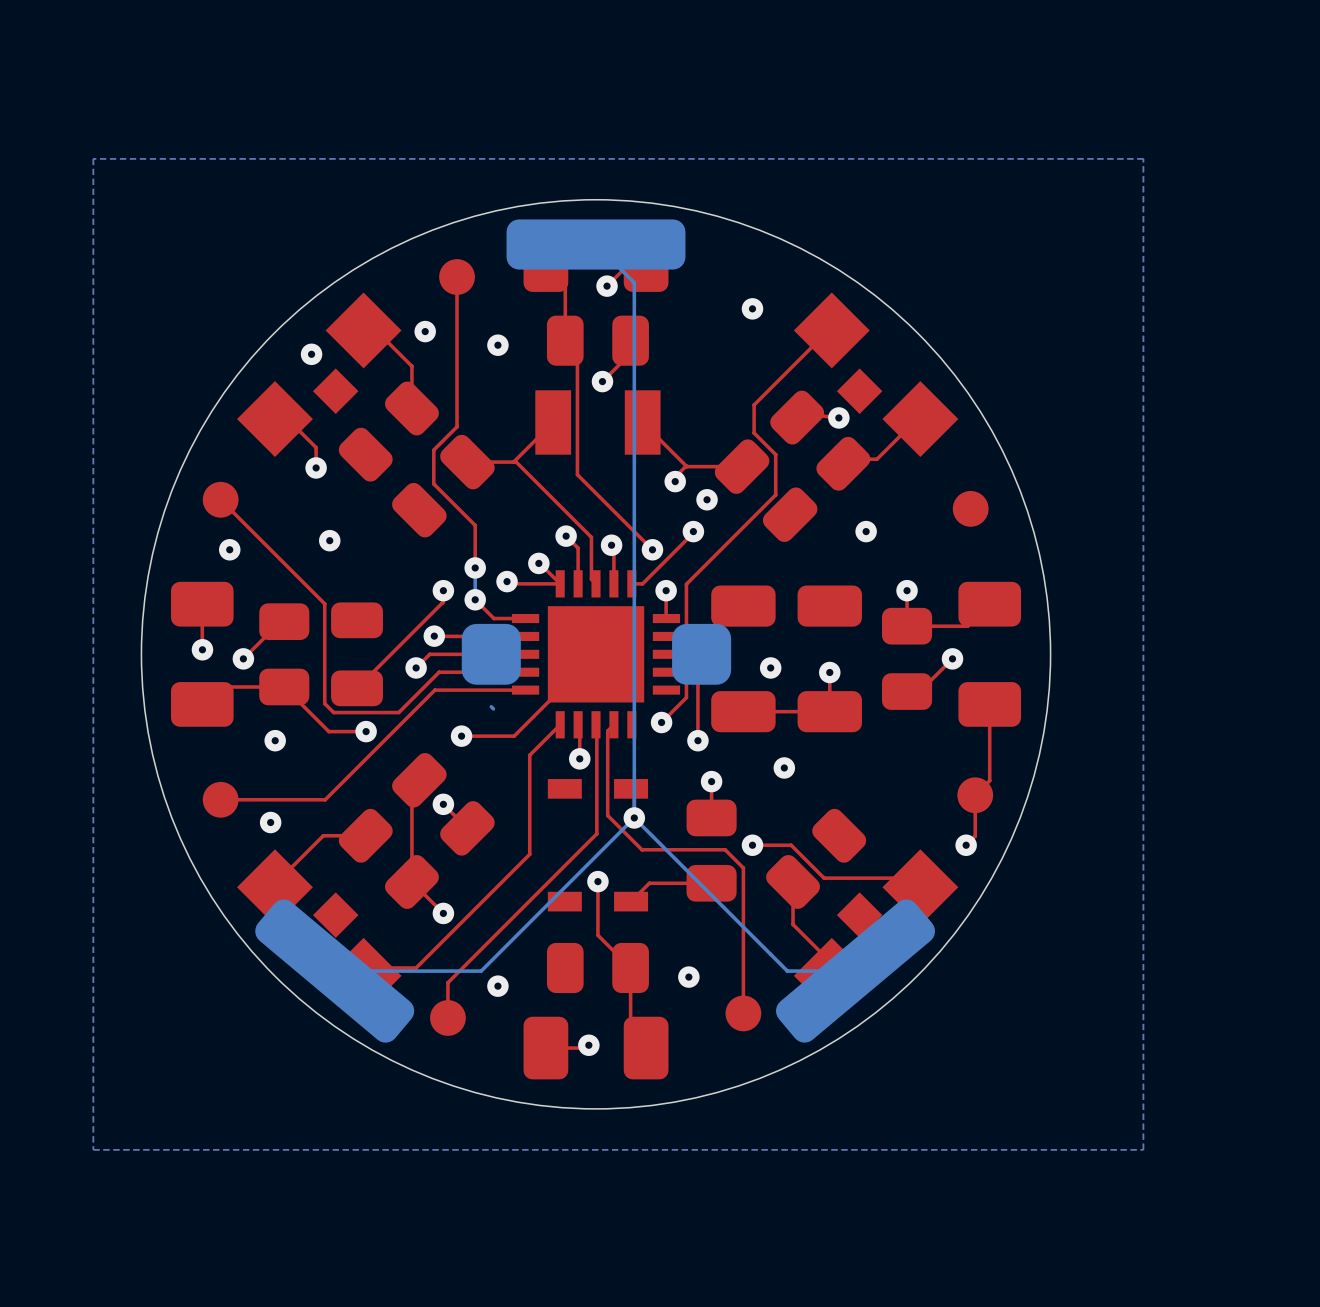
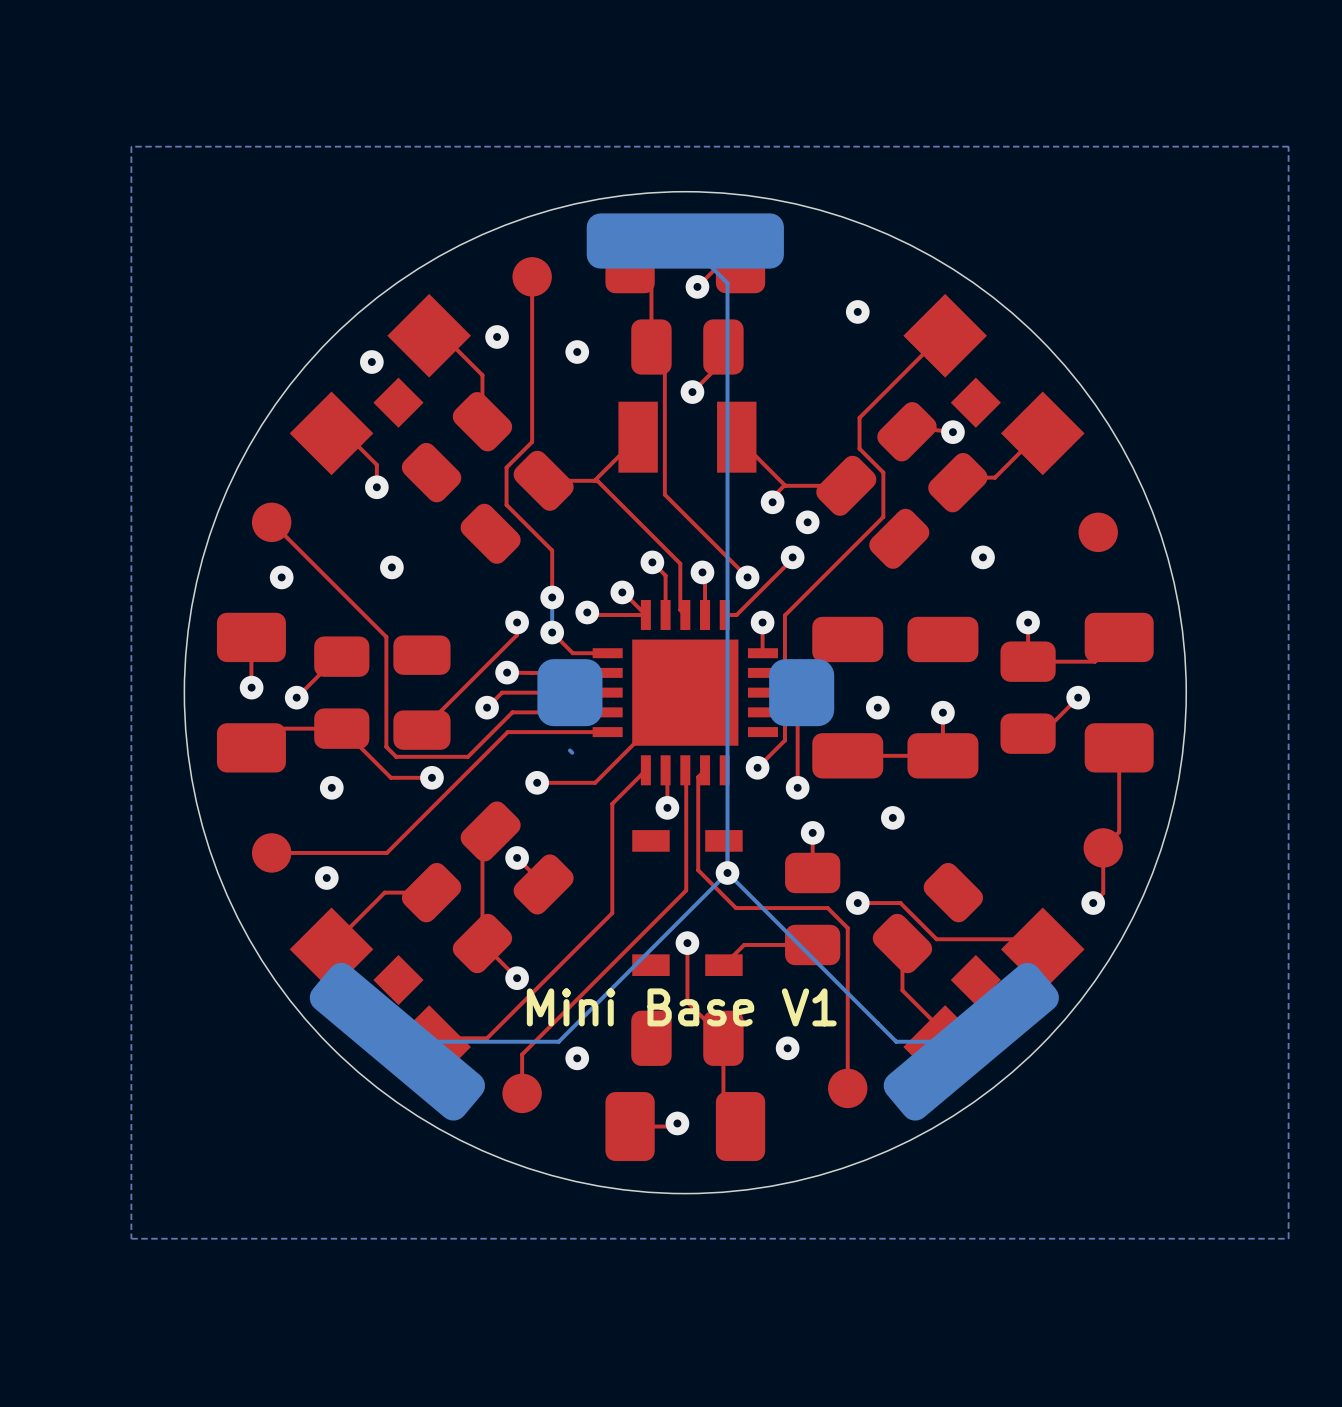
text: none -> Mini Base V1 (681, 1007)

